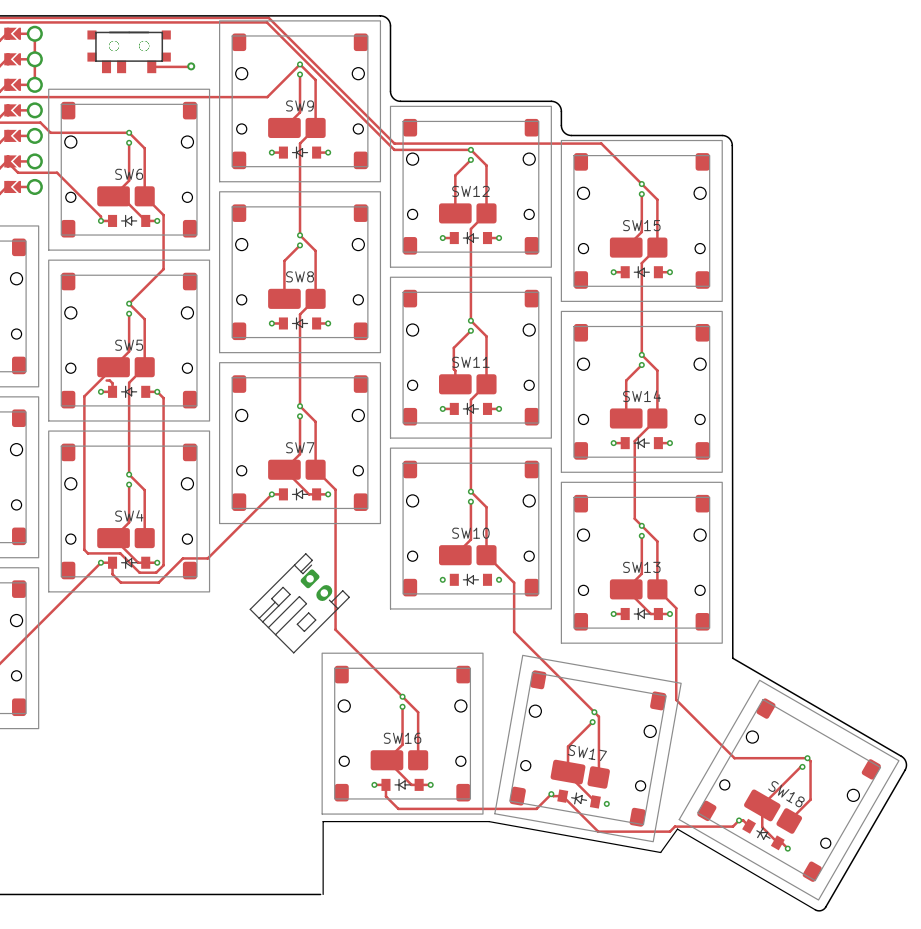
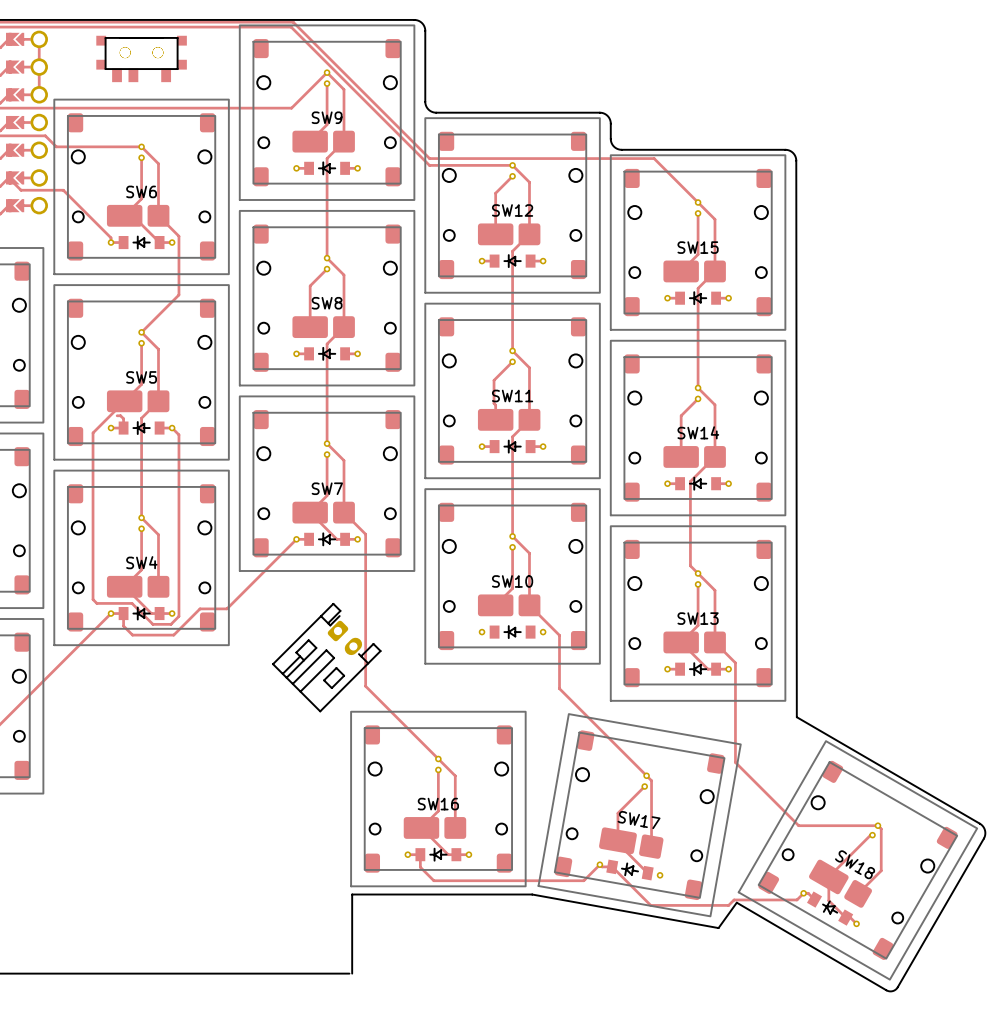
track: (151, 66) (191, 66) -> none
via: (191, 66) -> none

